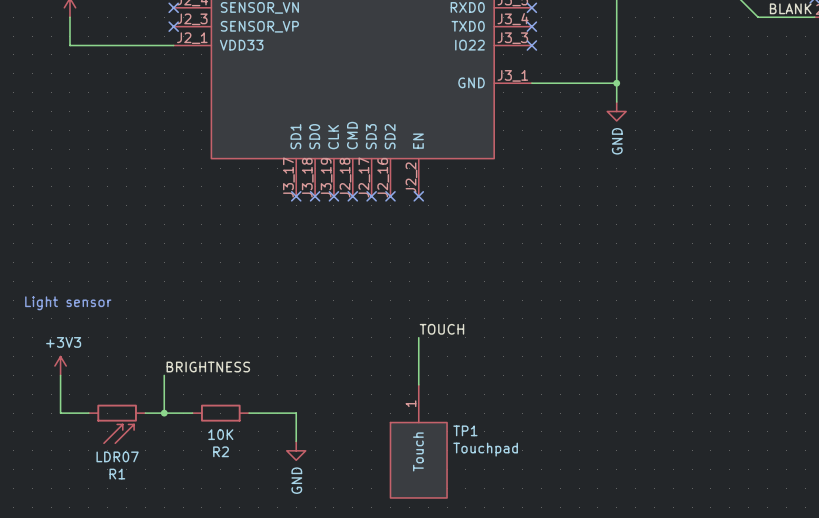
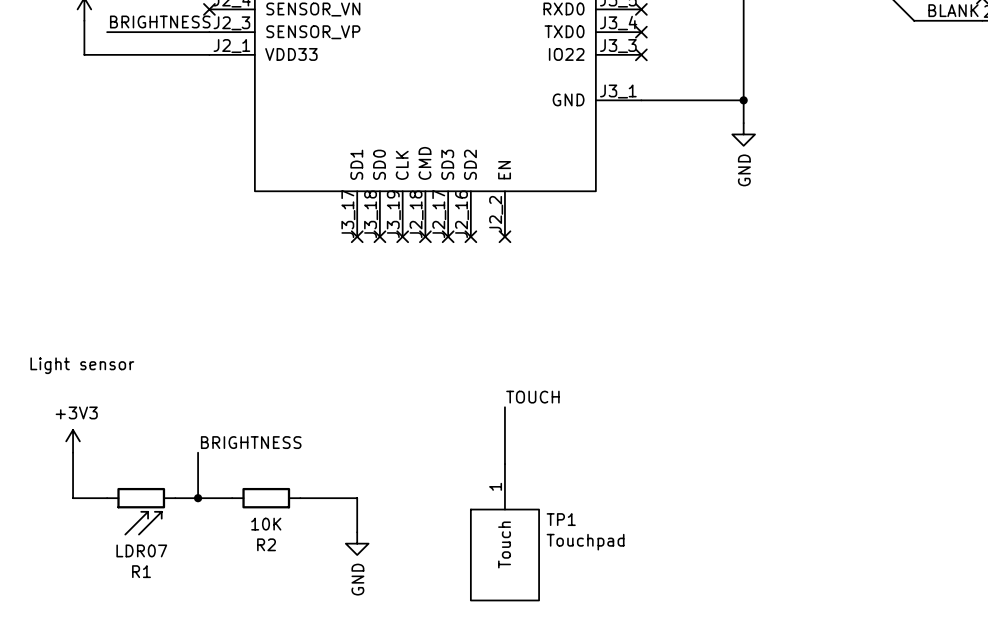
label: none -> BRIGHTNESS (160, 22)
wire: none -> (107, 32) (209, 32)
no-connect mark: (173, 26) -> none

